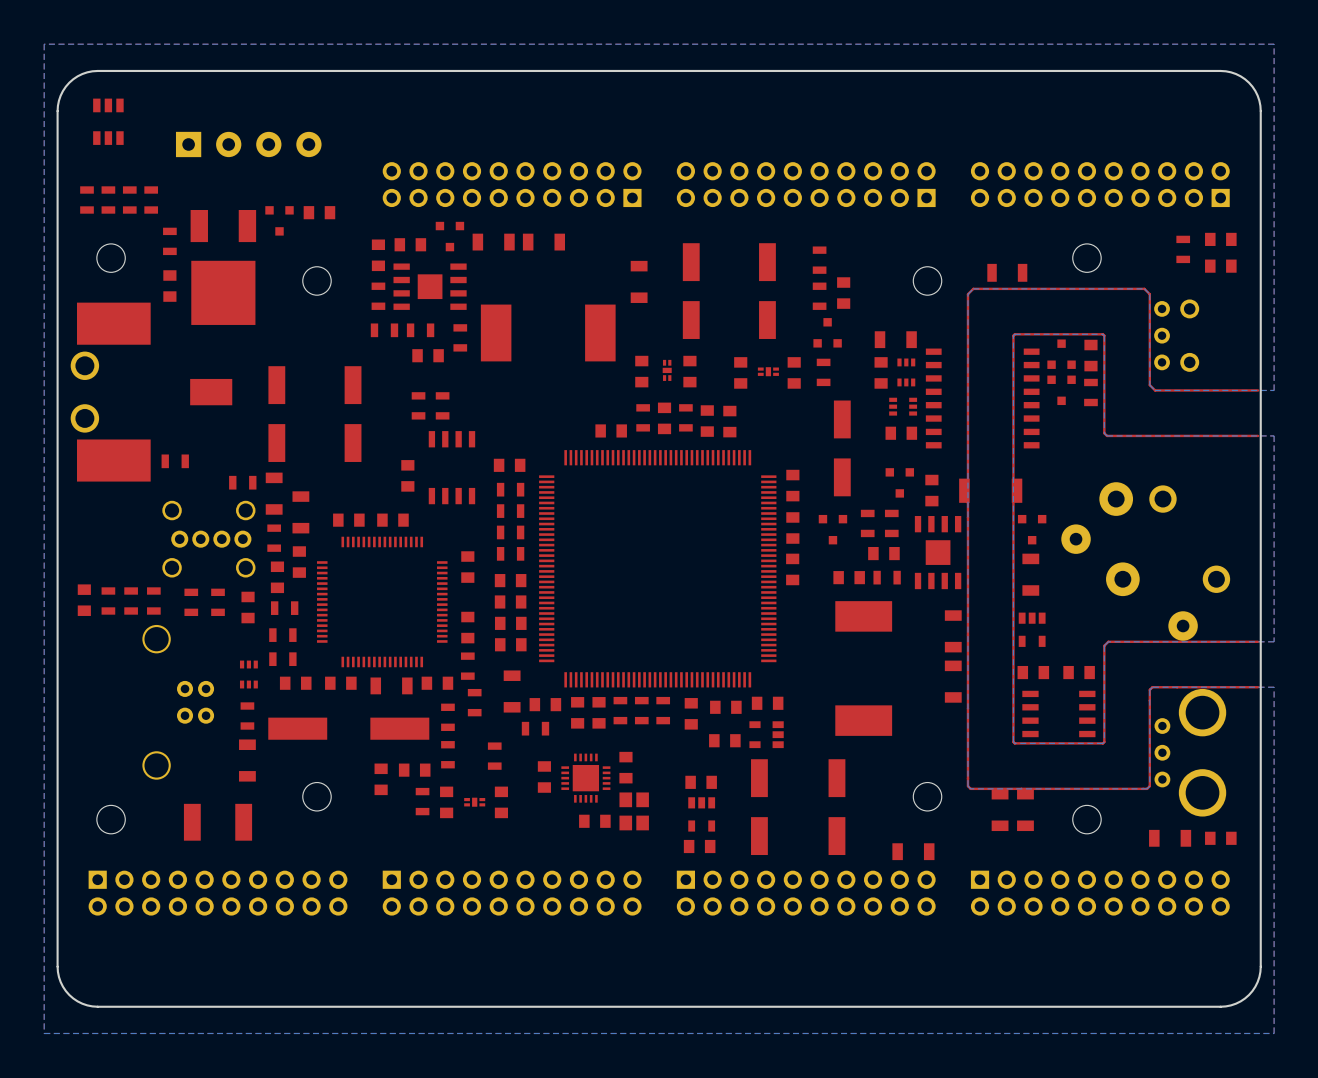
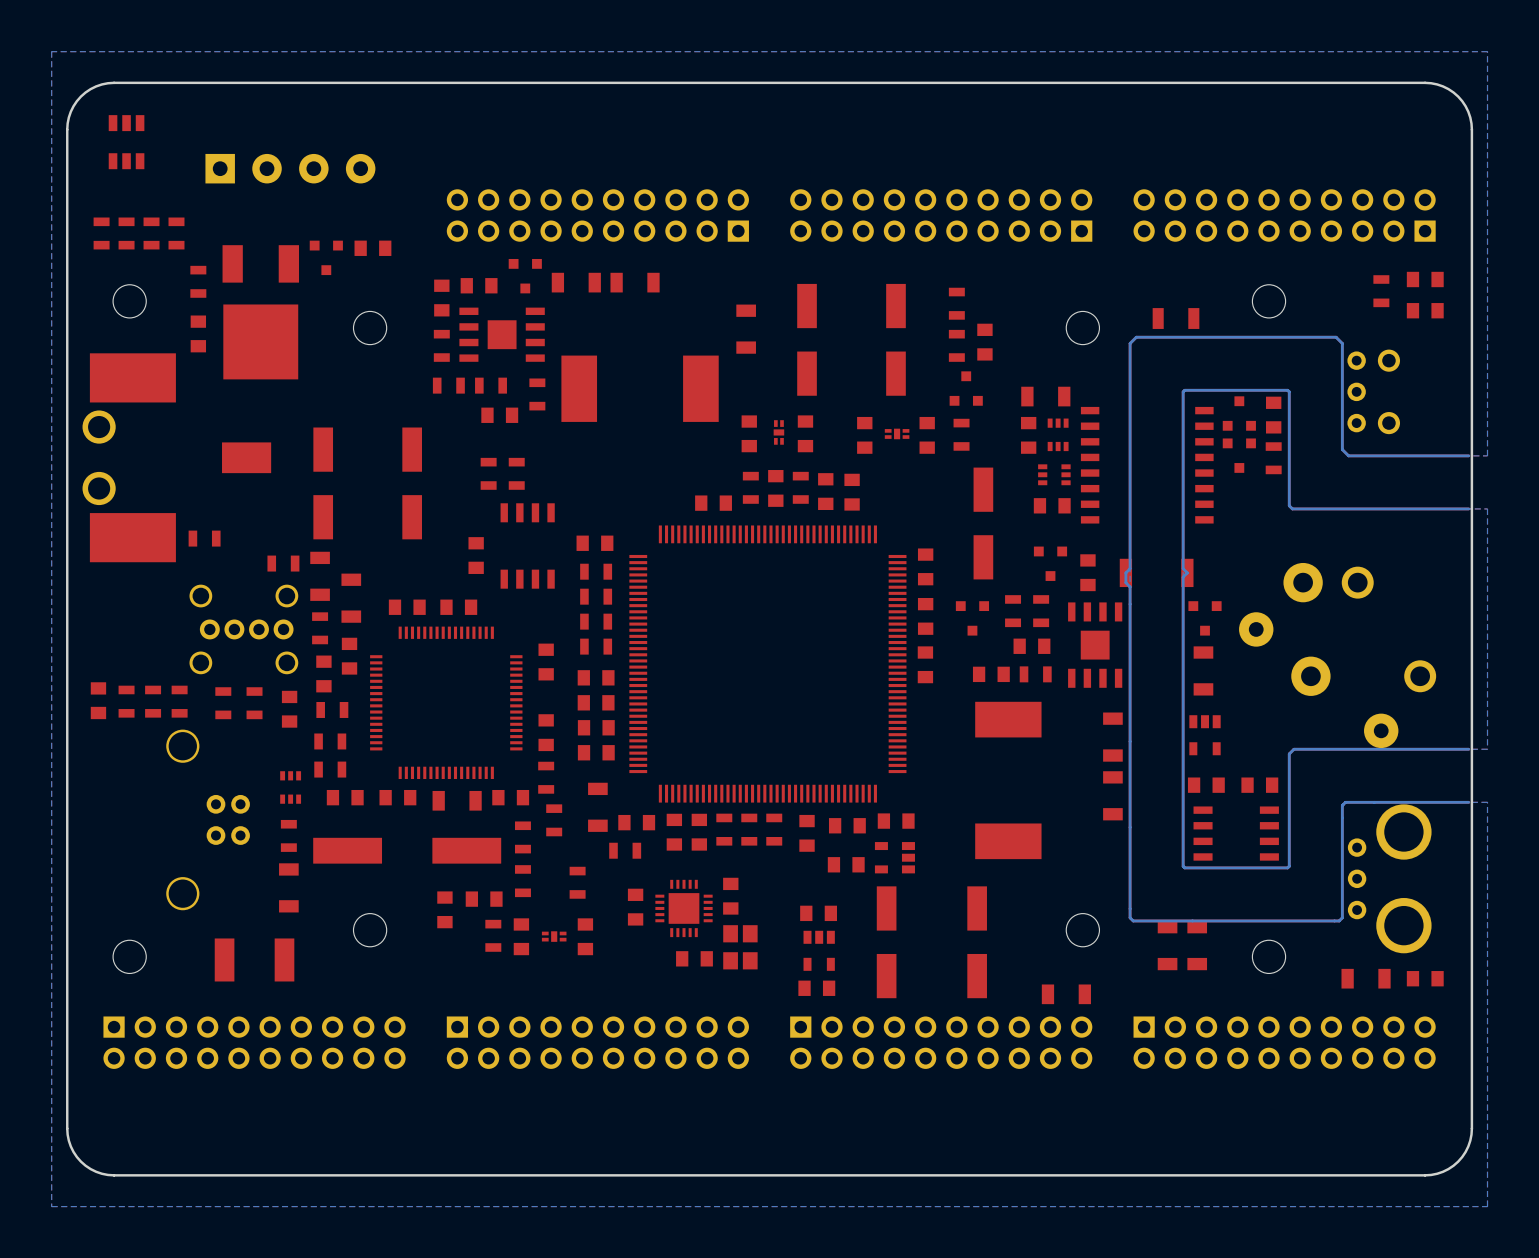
bottom track: none -> (1468, 455) (1348, 455) (1342, 449) (1342, 343) (1336, 337) (1136, 337) (1130, 343) (1130, 568) (1125, 572) (1125, 582) (1130, 586) (1130, 917) (1133, 920) (1339, 920) (1342, 917) (1342, 805) (1345, 802) (1468, 802)
bottom track: none -> (1468, 508) (1292, 508) (1289, 505) (1289, 391) (1287, 390) (1184, 390) (1183, 391) (1183, 568) (1187, 572) (1183, 577) (1183, 866) (1184, 867) (1287, 867) (1289, 866) (1289, 753) (1293, 749) (1468, 749)

